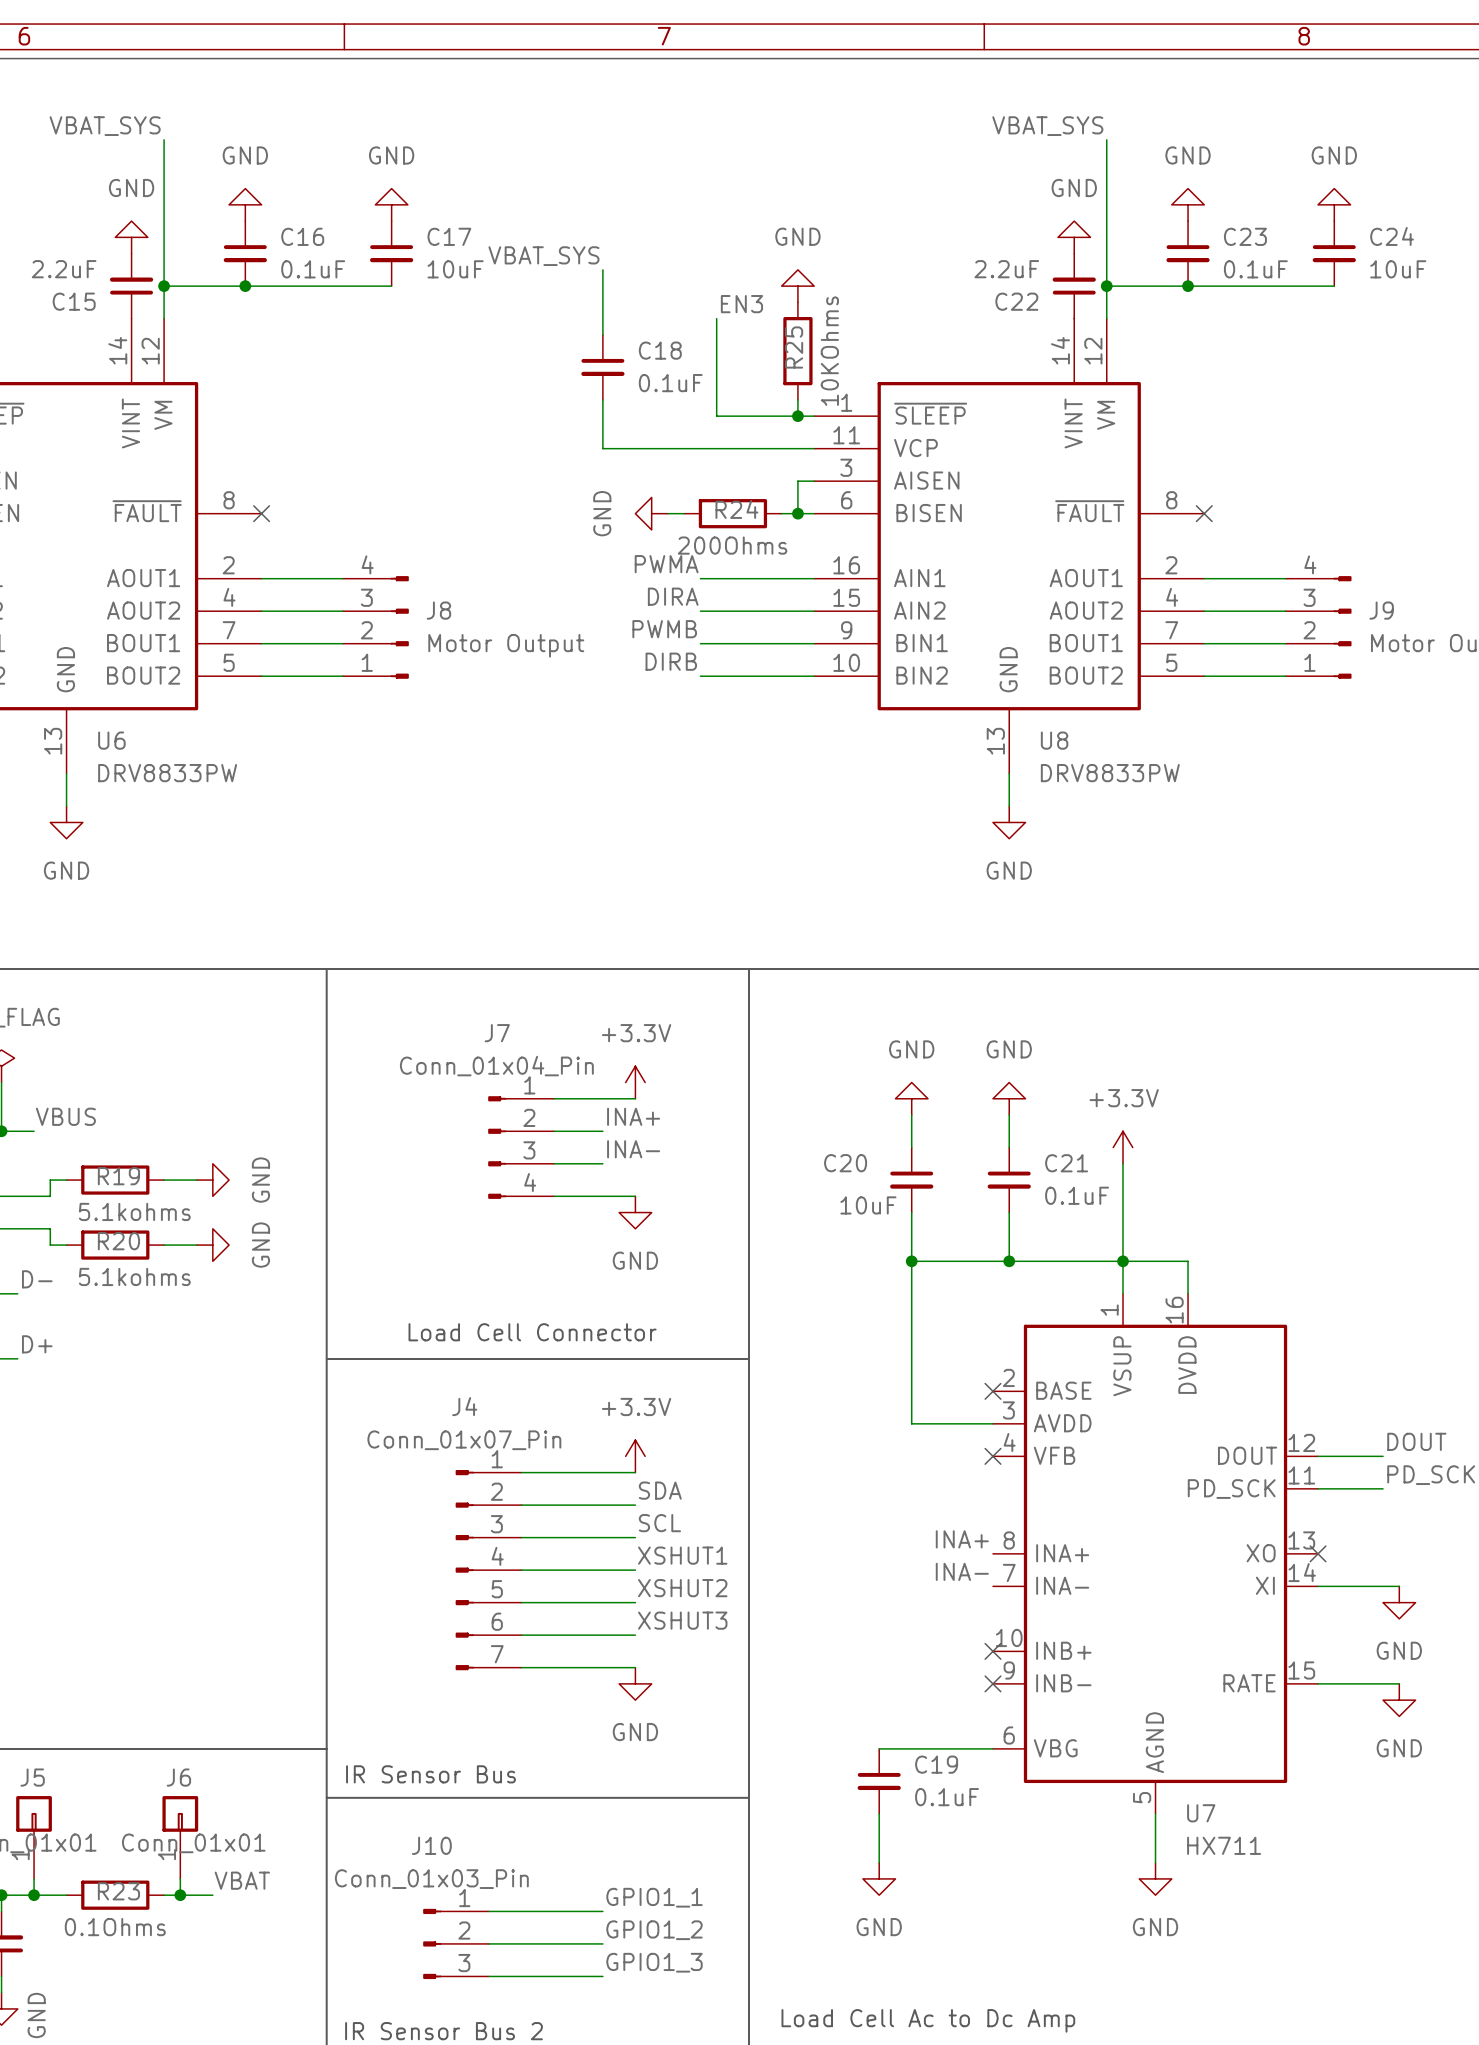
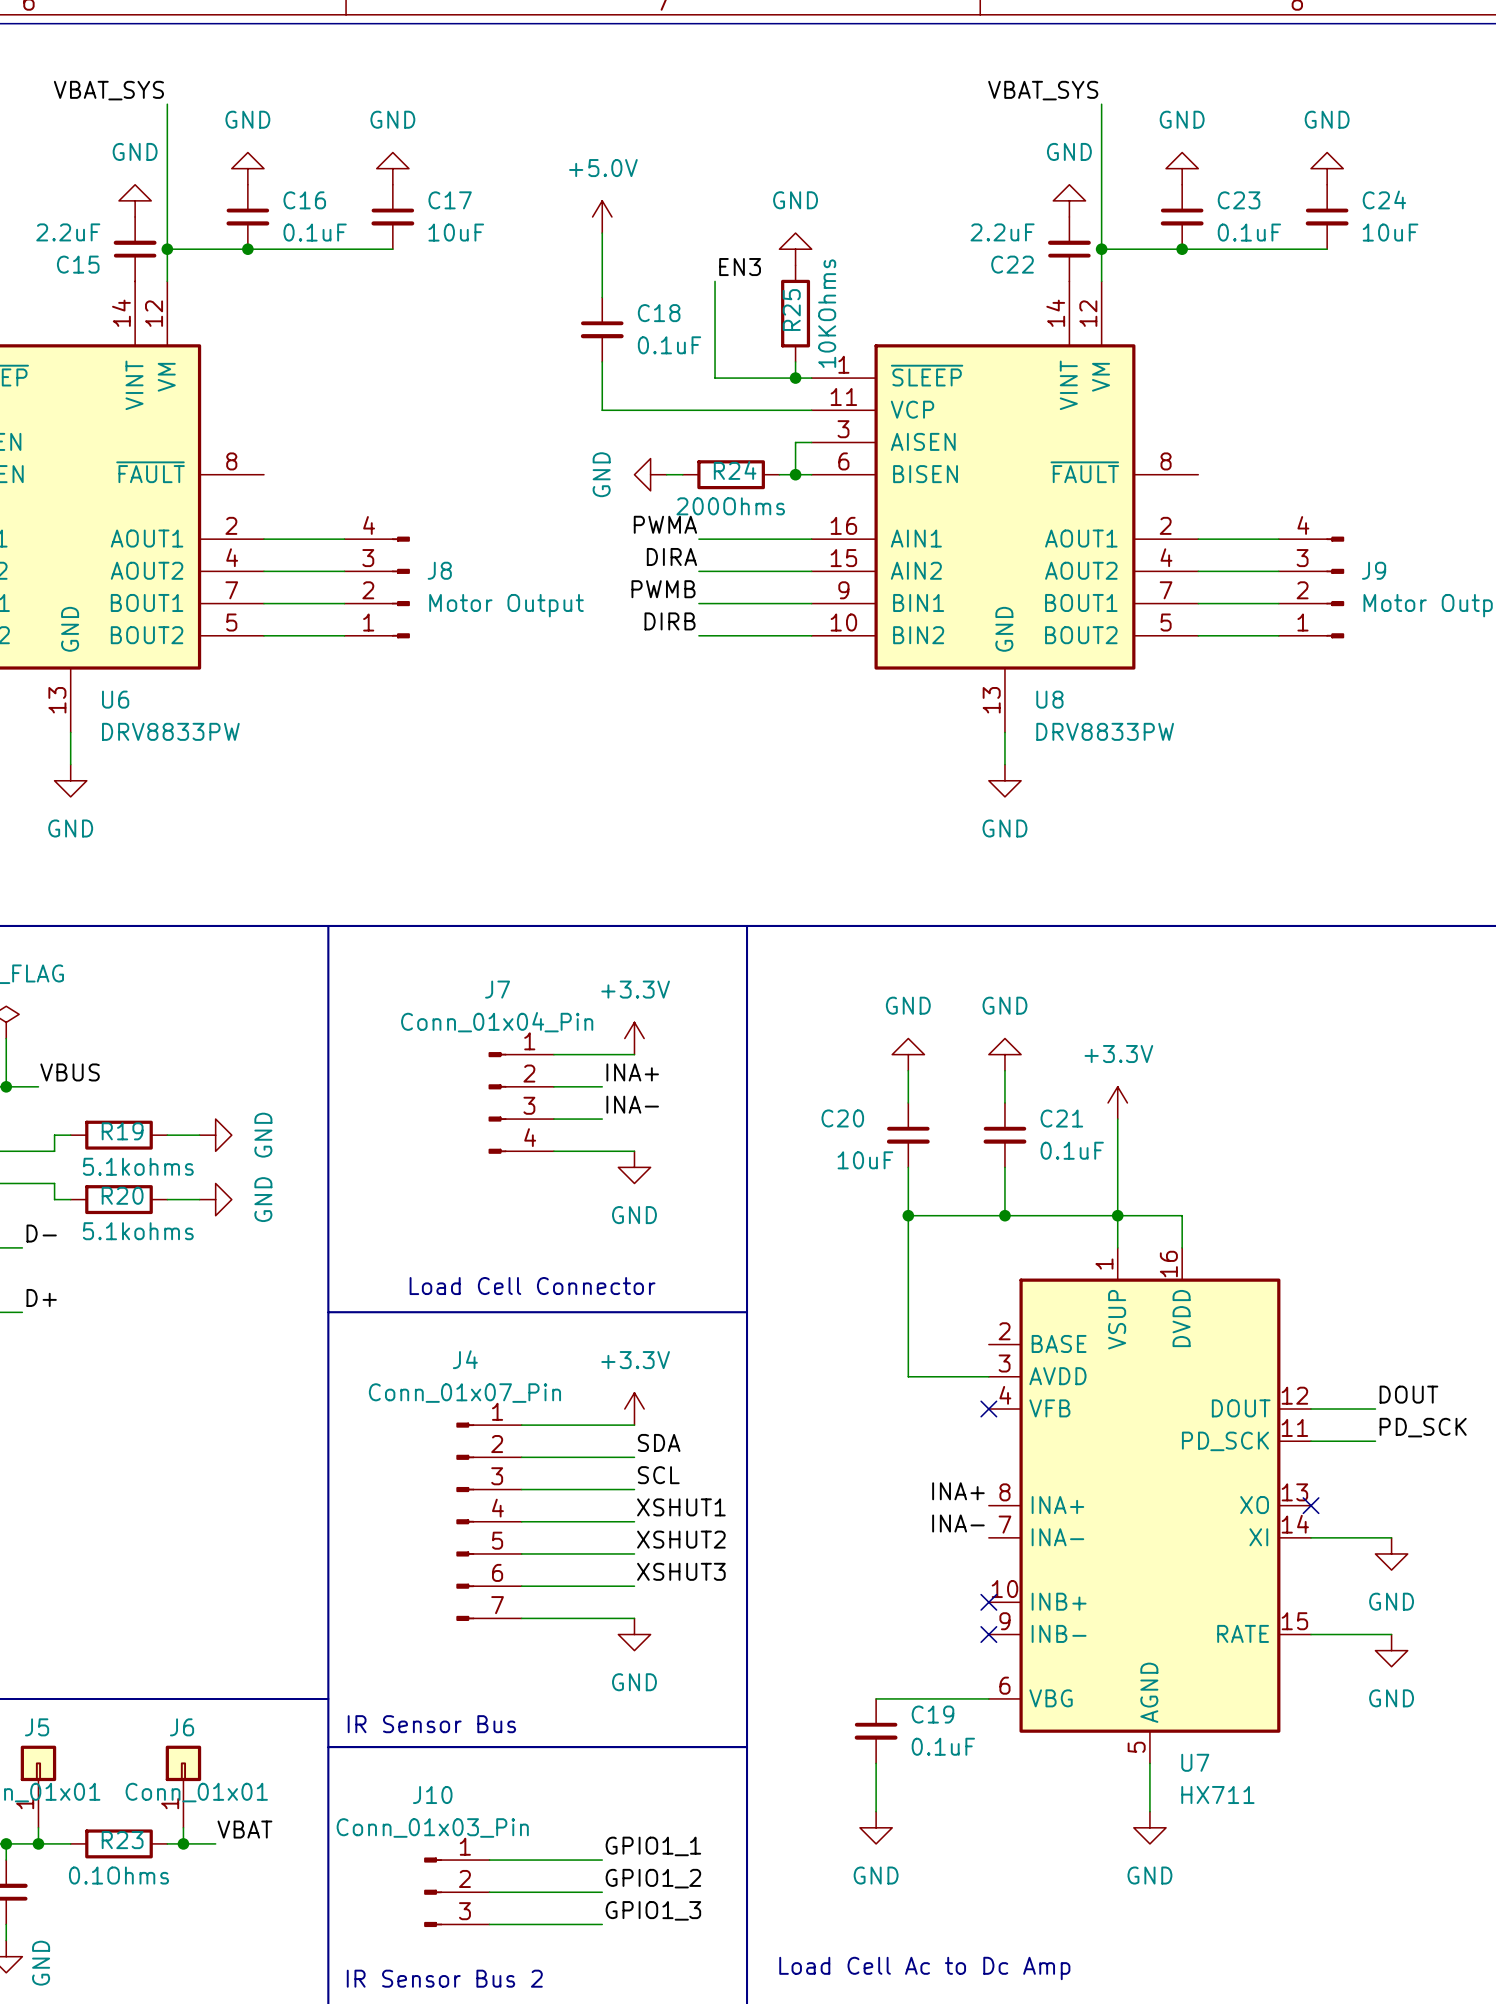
power symbol: none -> +5.0V (602, 216)
label: VBAT_SYS (543, 256) -> none
no-connect mark: (261, 513) -> none
no-connect mark: (1204, 513) -> none
no-connect mark: (992, 1391) -> none

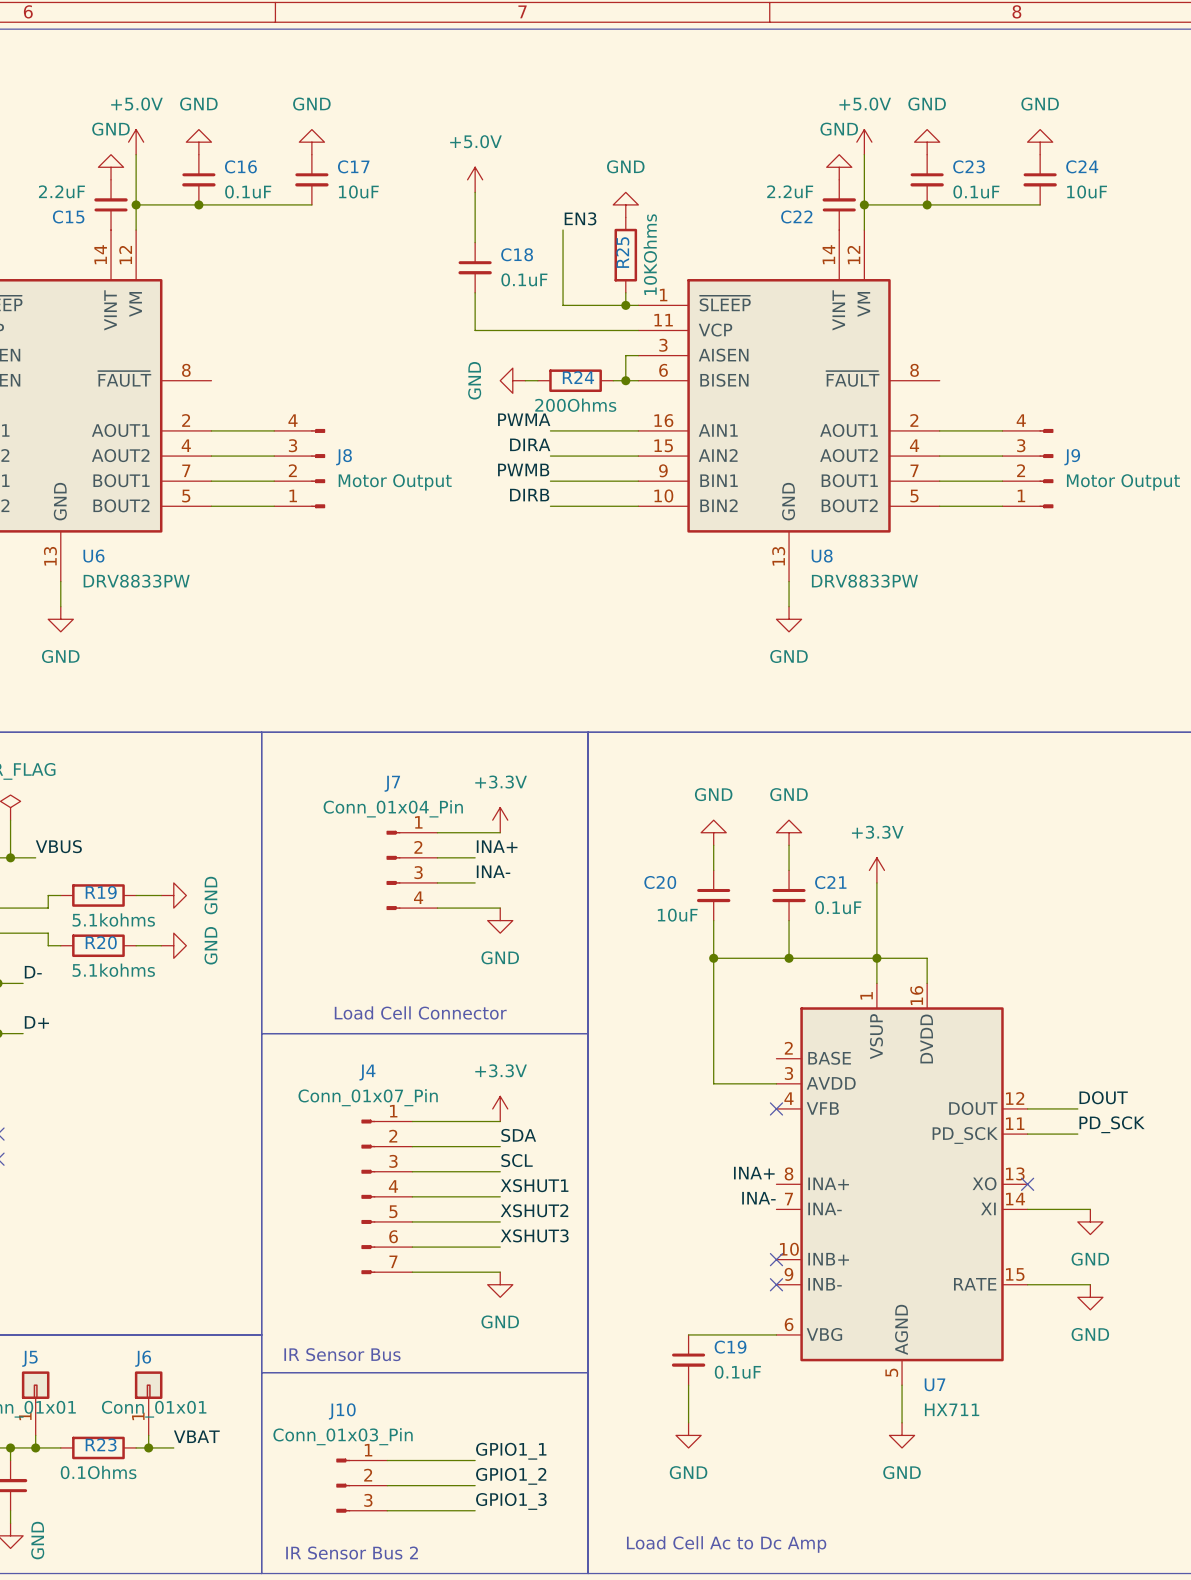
label: VBAT_SYS (108, 90) -> none
label: VBAT_SYS (1043, 90) -> none
wire: (167, 104) (167, 184) -> none
wire: (1101, 104) (1101, 184) -> none
power symbol: none -> +5.0V (136, 142)
power symbol: none -> +5.0V (864, 142)

